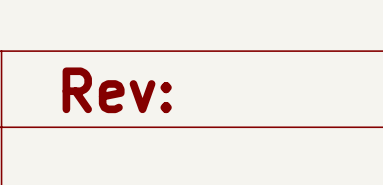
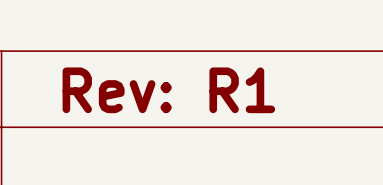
title block: Rev: (117, 90) -> Rev: R1 (168, 90)

